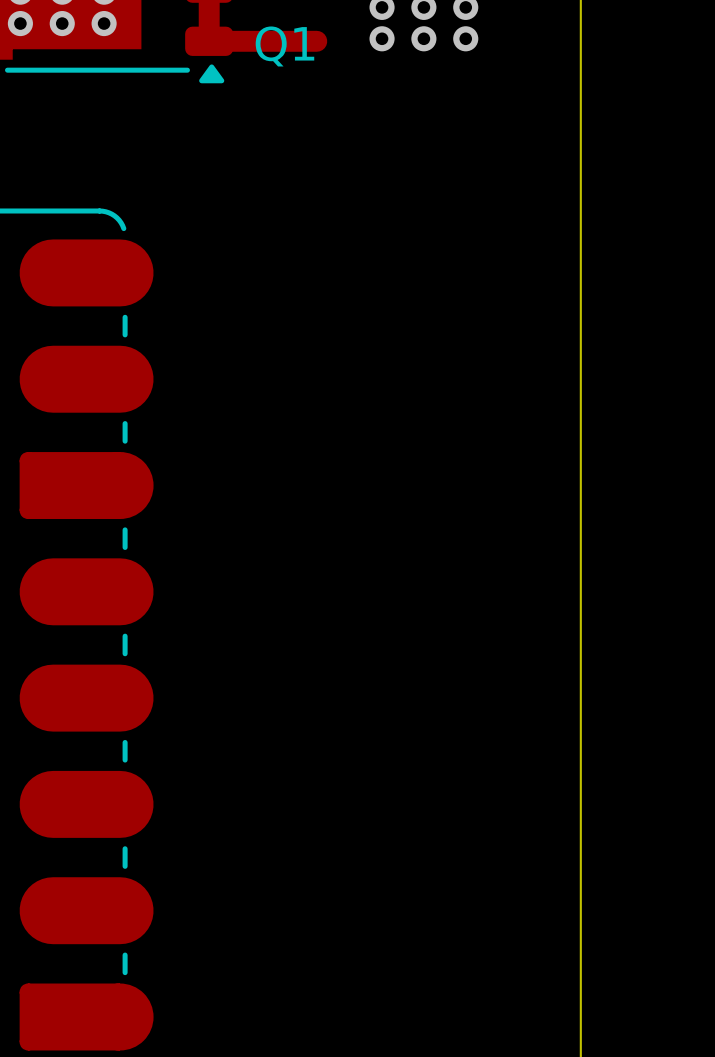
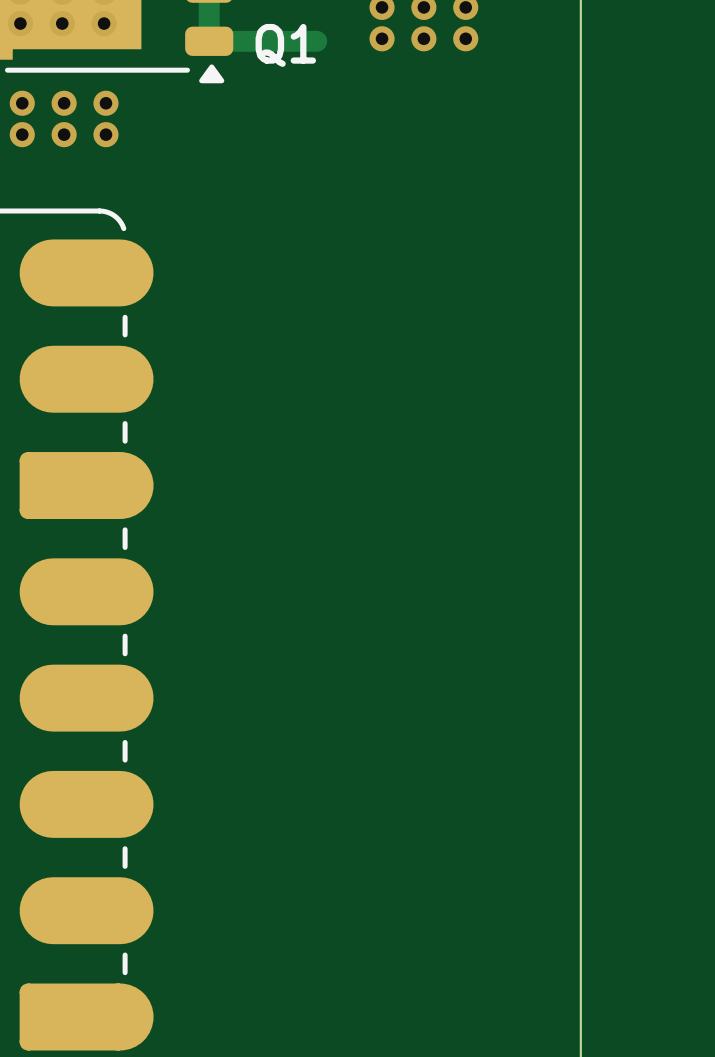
via: none -> (22, 103)
via: none -> (64, 103)
via: none -> (105, 103)
via: none -> (22, 134)
via: none -> (64, 134)
via: none -> (105, 134)

